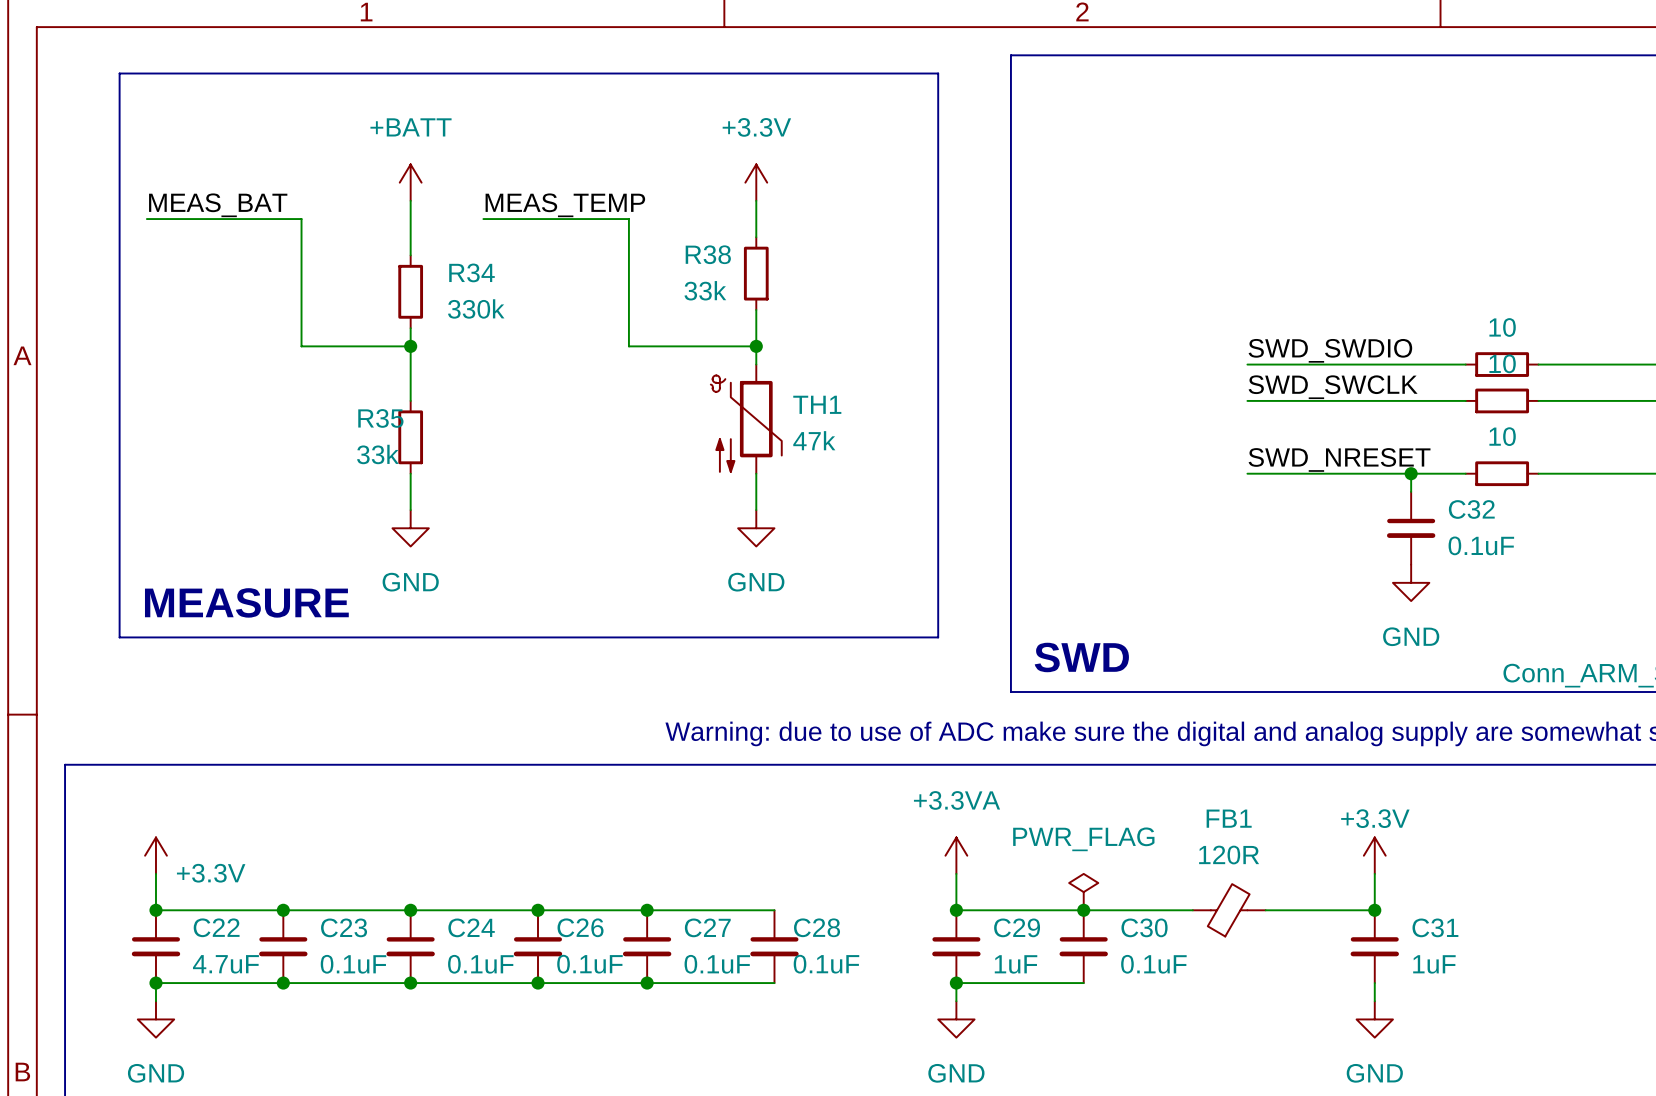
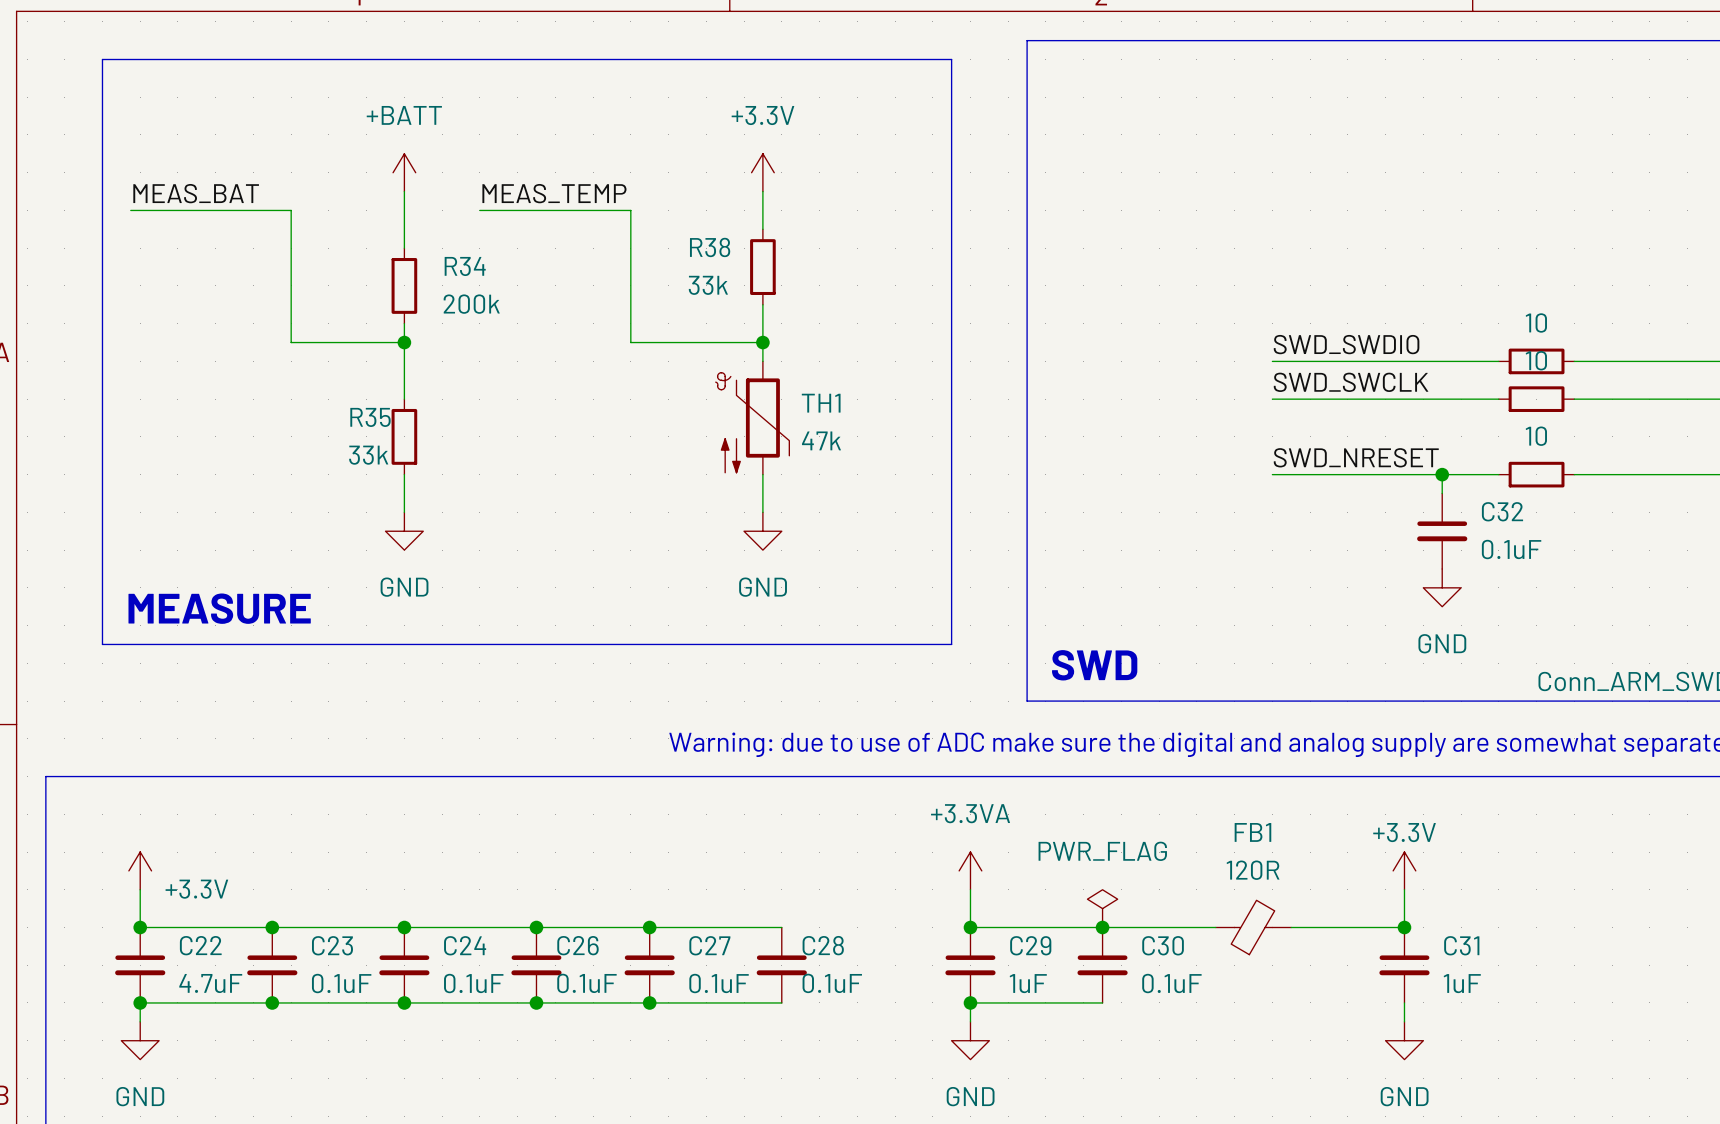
R34 value: 330k (476, 308) -> 200k (471, 304)

